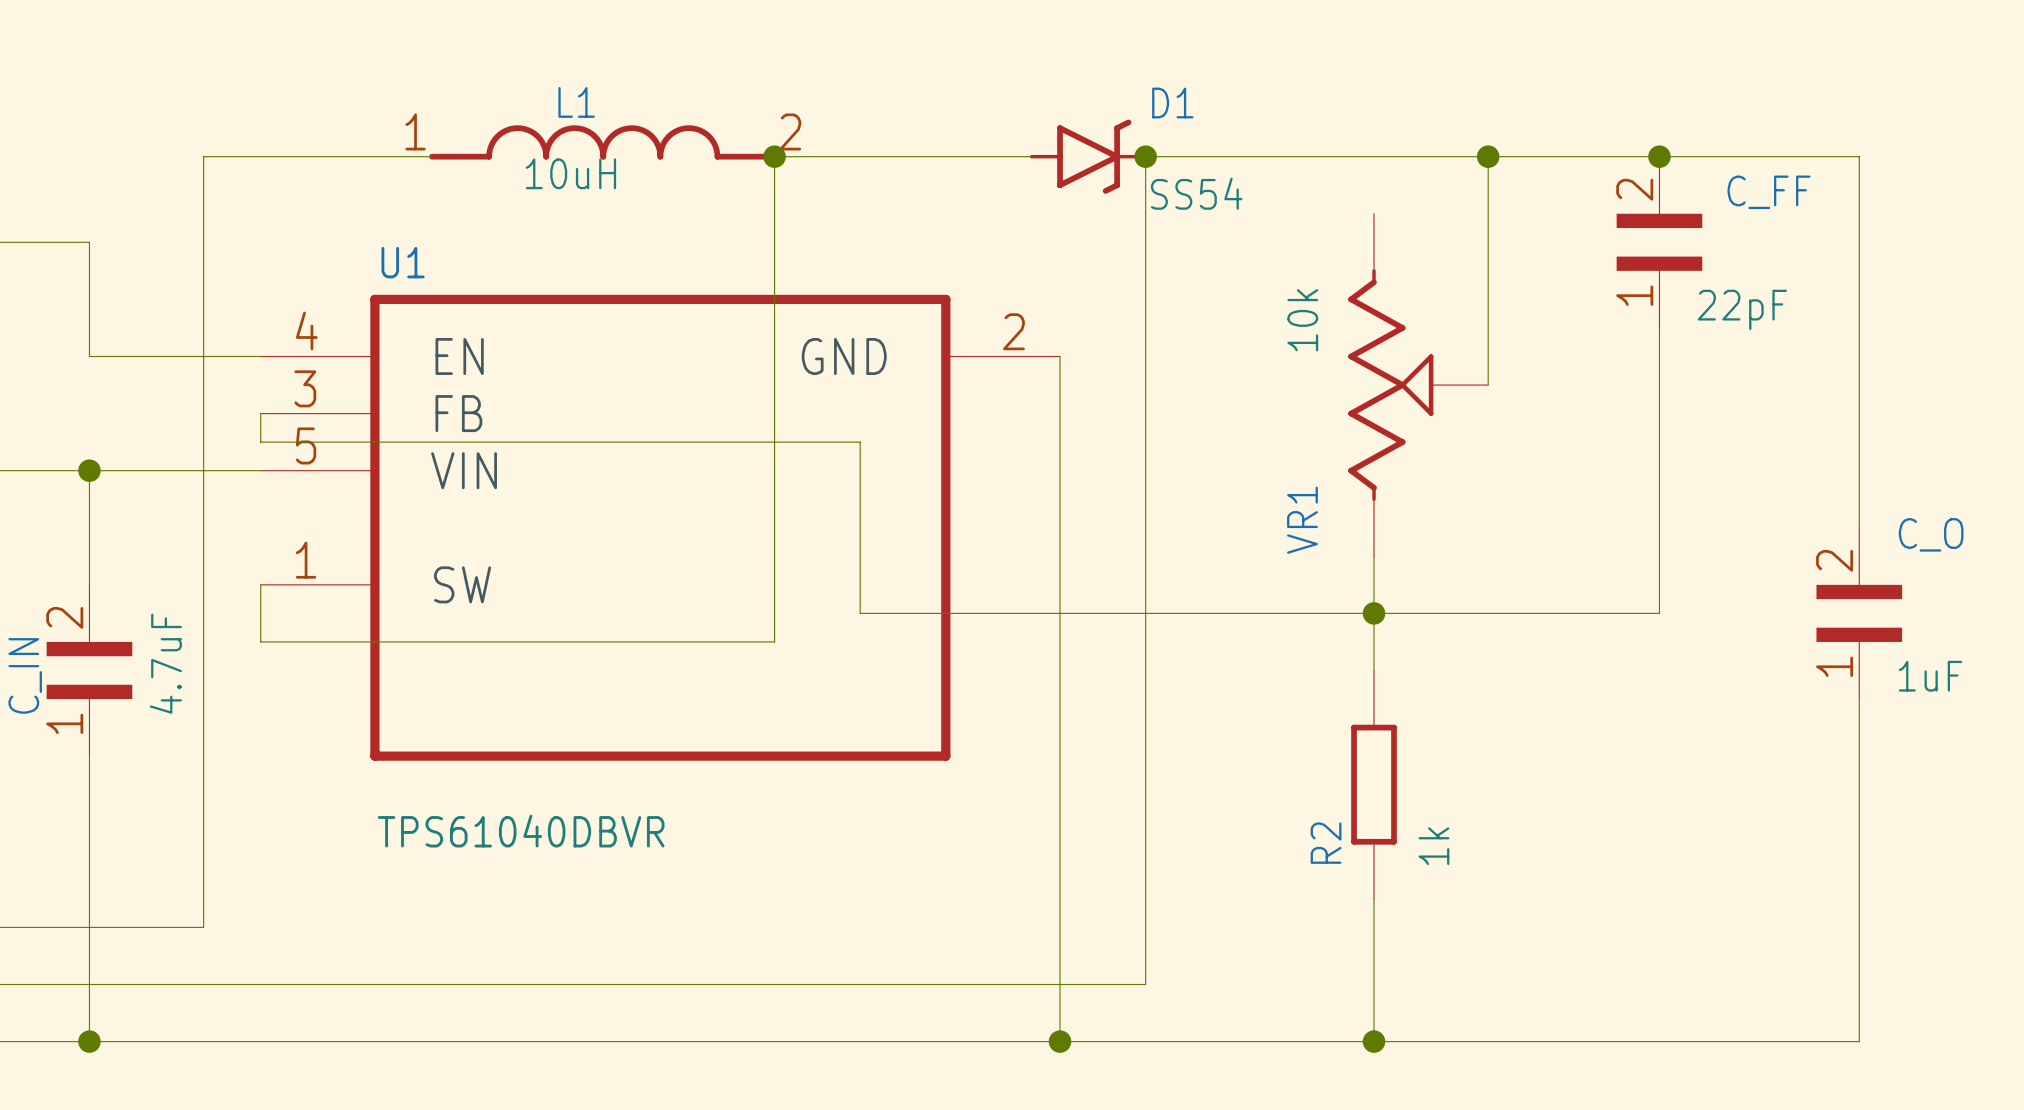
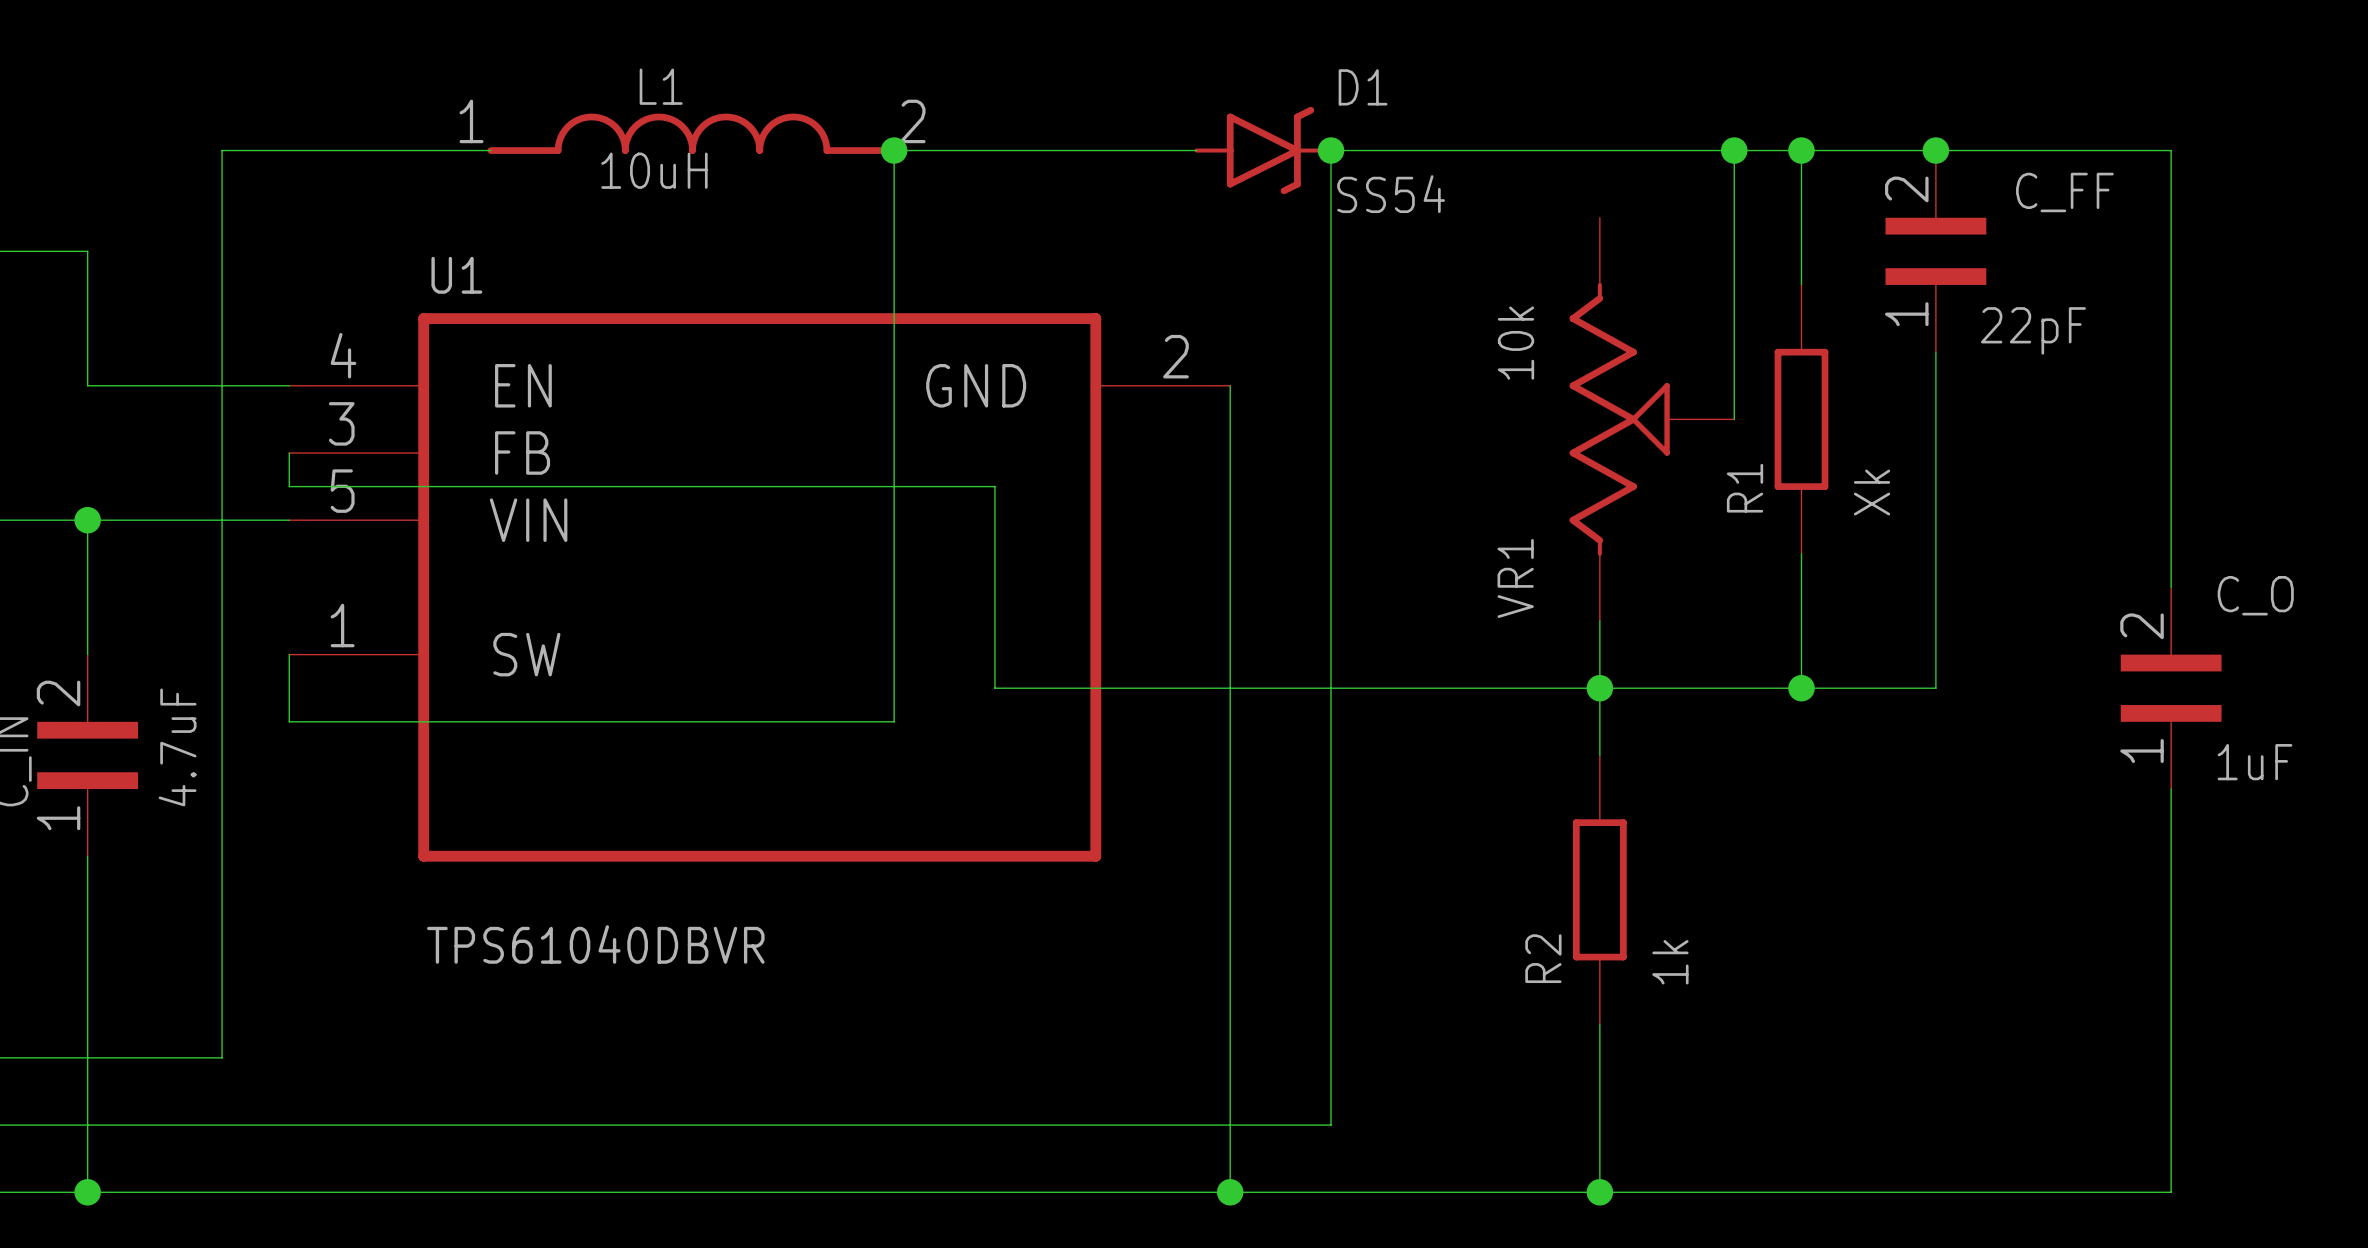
wire: none -> (1801, 150) (1801, 284)
junction: none -> (1801, 150)
R1: none -> Xk (1801, 419)
wire: none -> (1801, 553) (1801, 688)
junction: none -> (1801, 688)

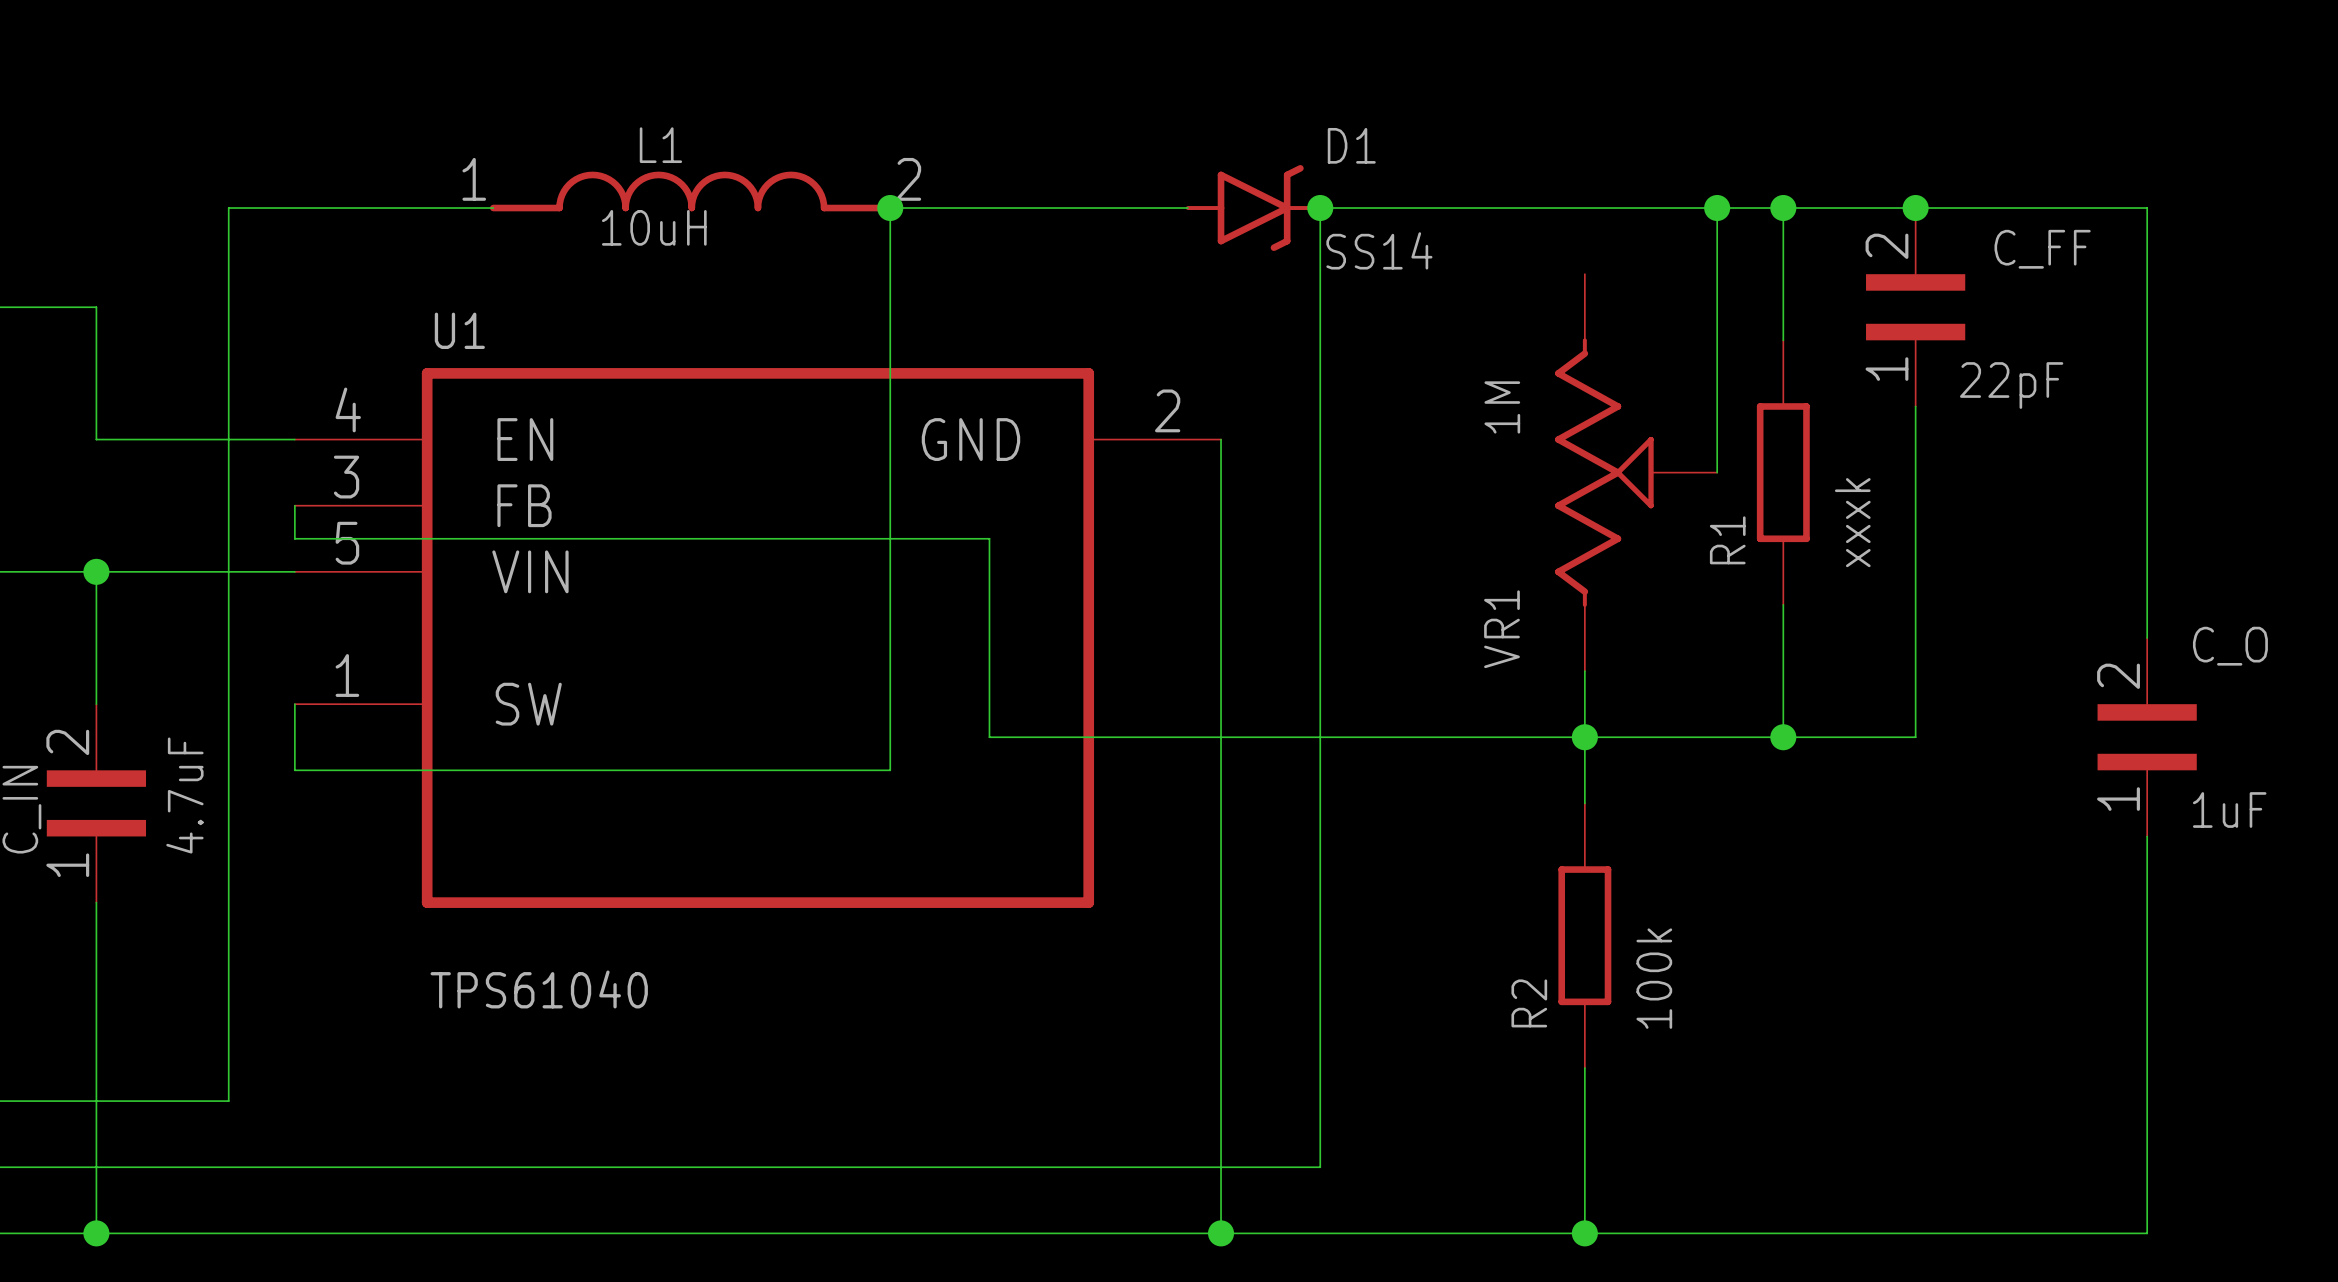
D1 value: SS54 (1391, 194) -> SS14 (1379, 250)
VR1 value: 10k (1516, 343) -> 1M (1502, 407)
R1 value: Xk (1872, 492) -> xxxk (1852, 522)
U1 value: TPS61040DBVR (595, 944) -> TPS61040 (539, 989)
R2 value: 1k (1670, 962) -> 100k (1654, 978)

